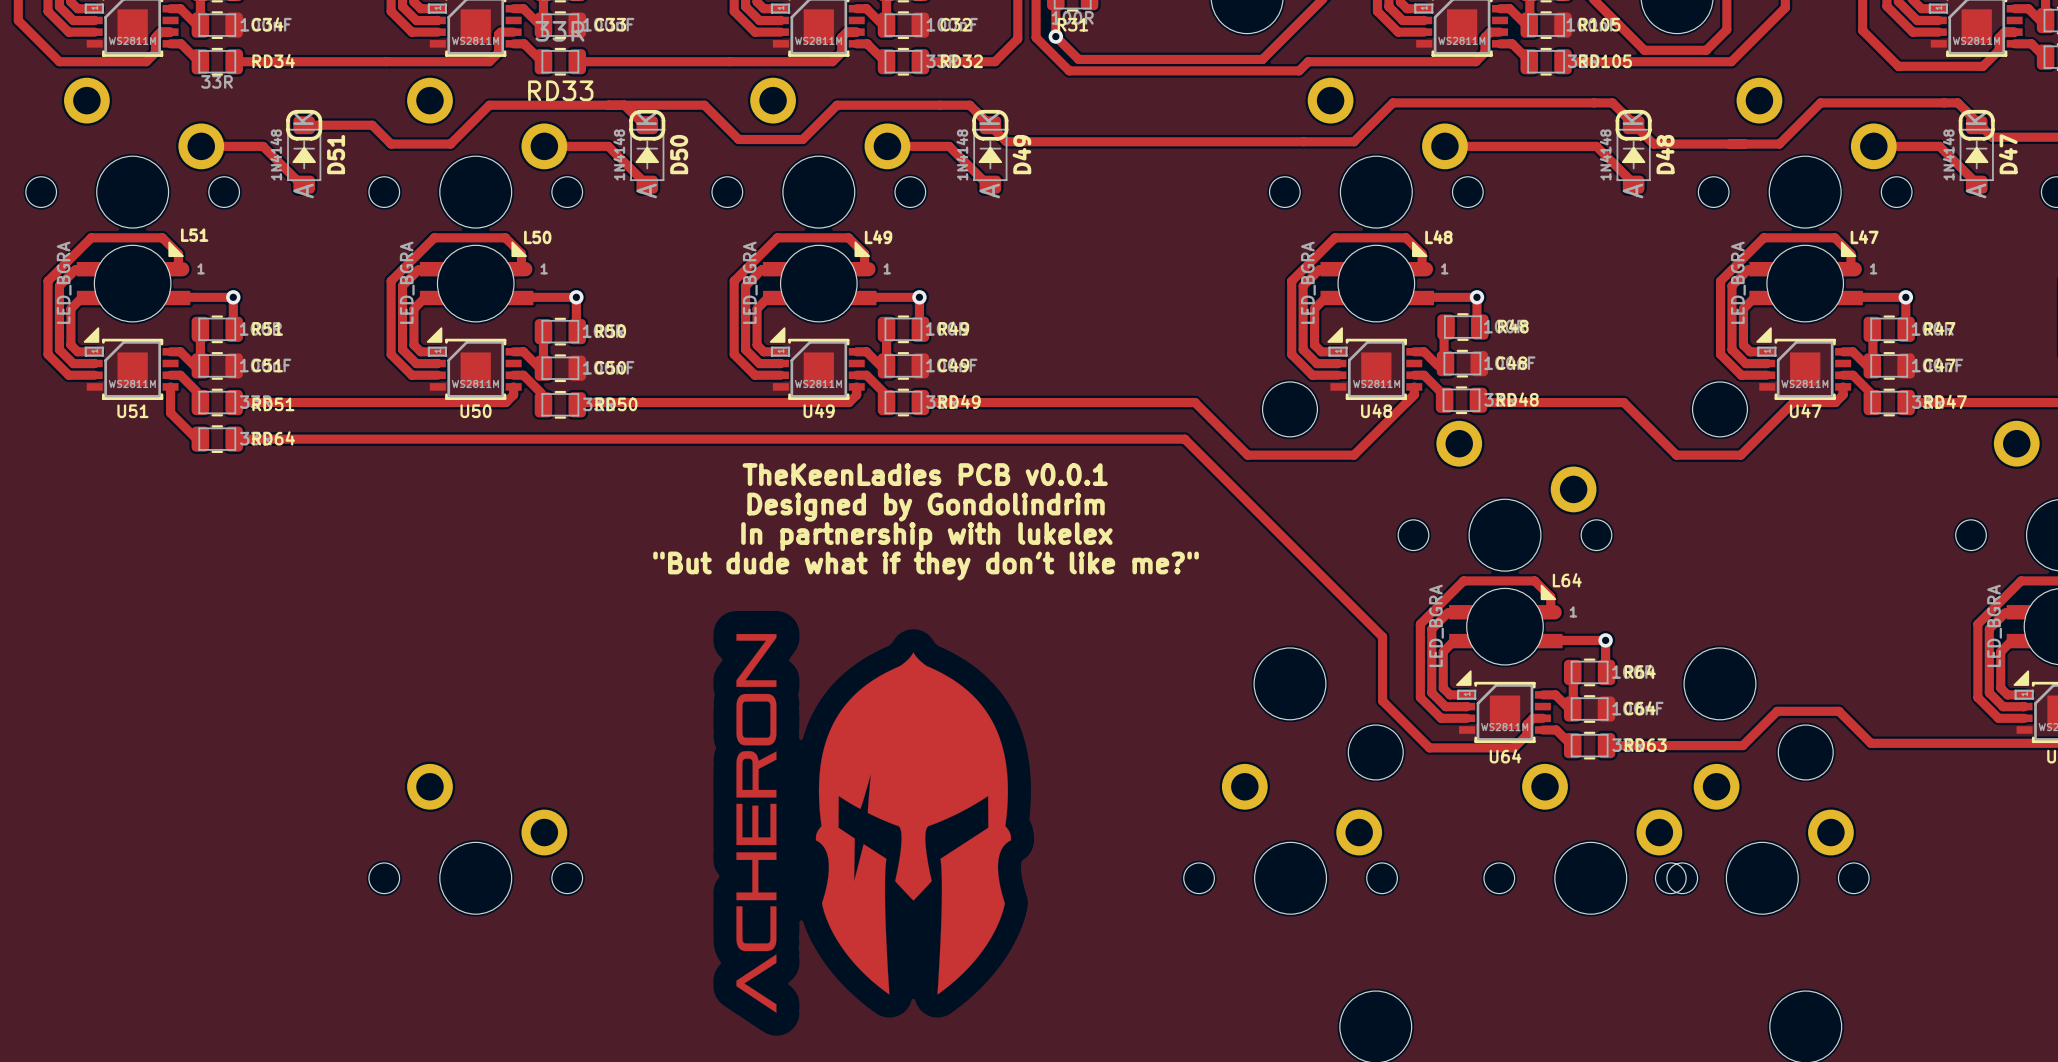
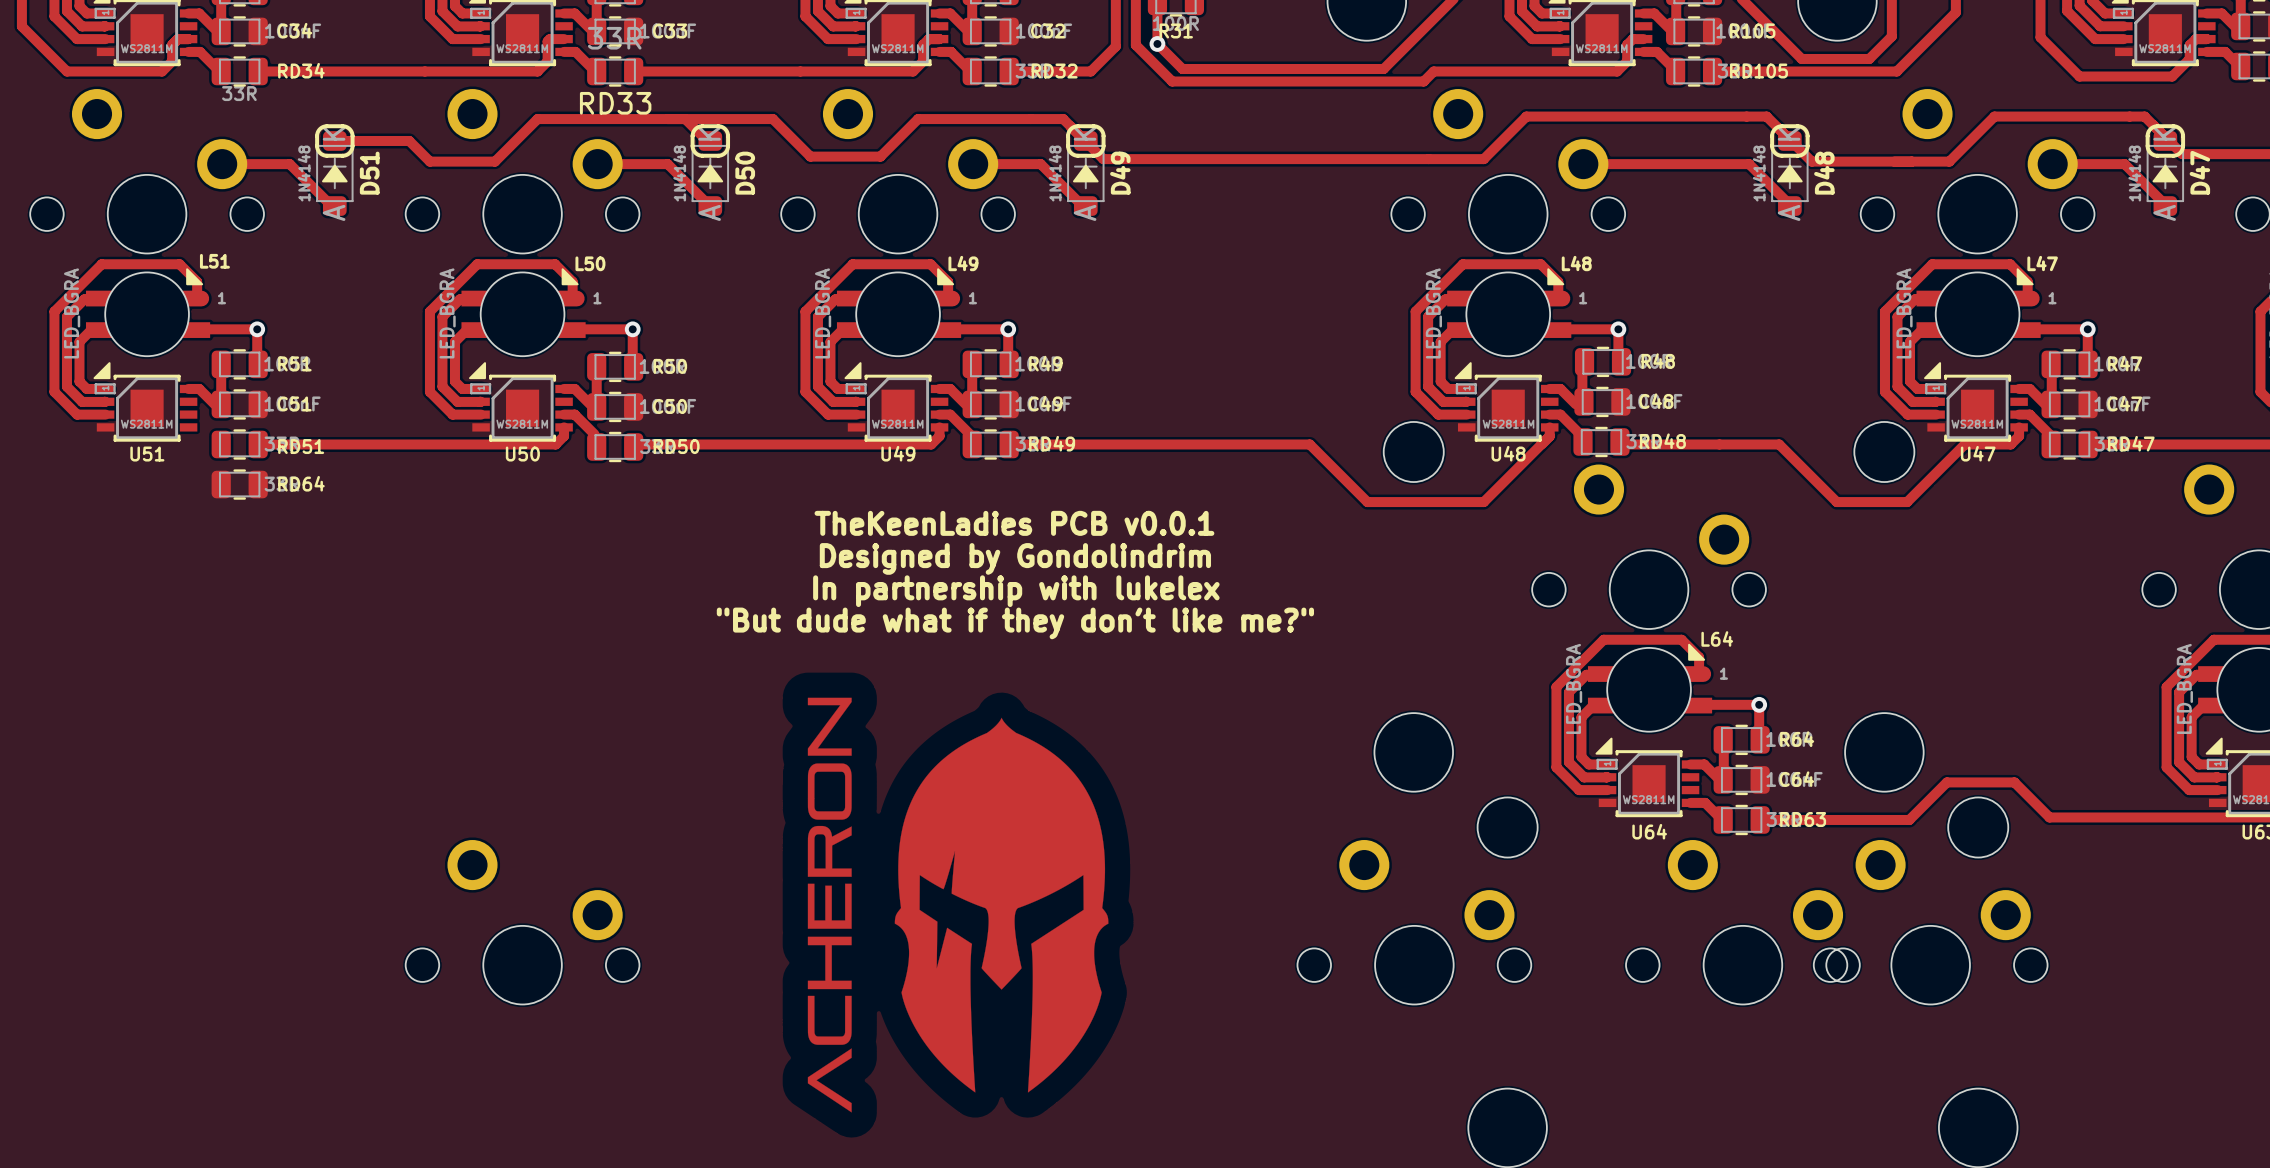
track: (170, 375) (180, 375) (196, 391) -> none
track: (170, 386) (170, 412) (196, 439) -> none
track: (234, 439) (1184, 439) (1382, 636) (1382, 701) (1429, 747) (1513, 747) (1526, 734) (1526, 724) (1533, 718) (1542, 718) -> none

